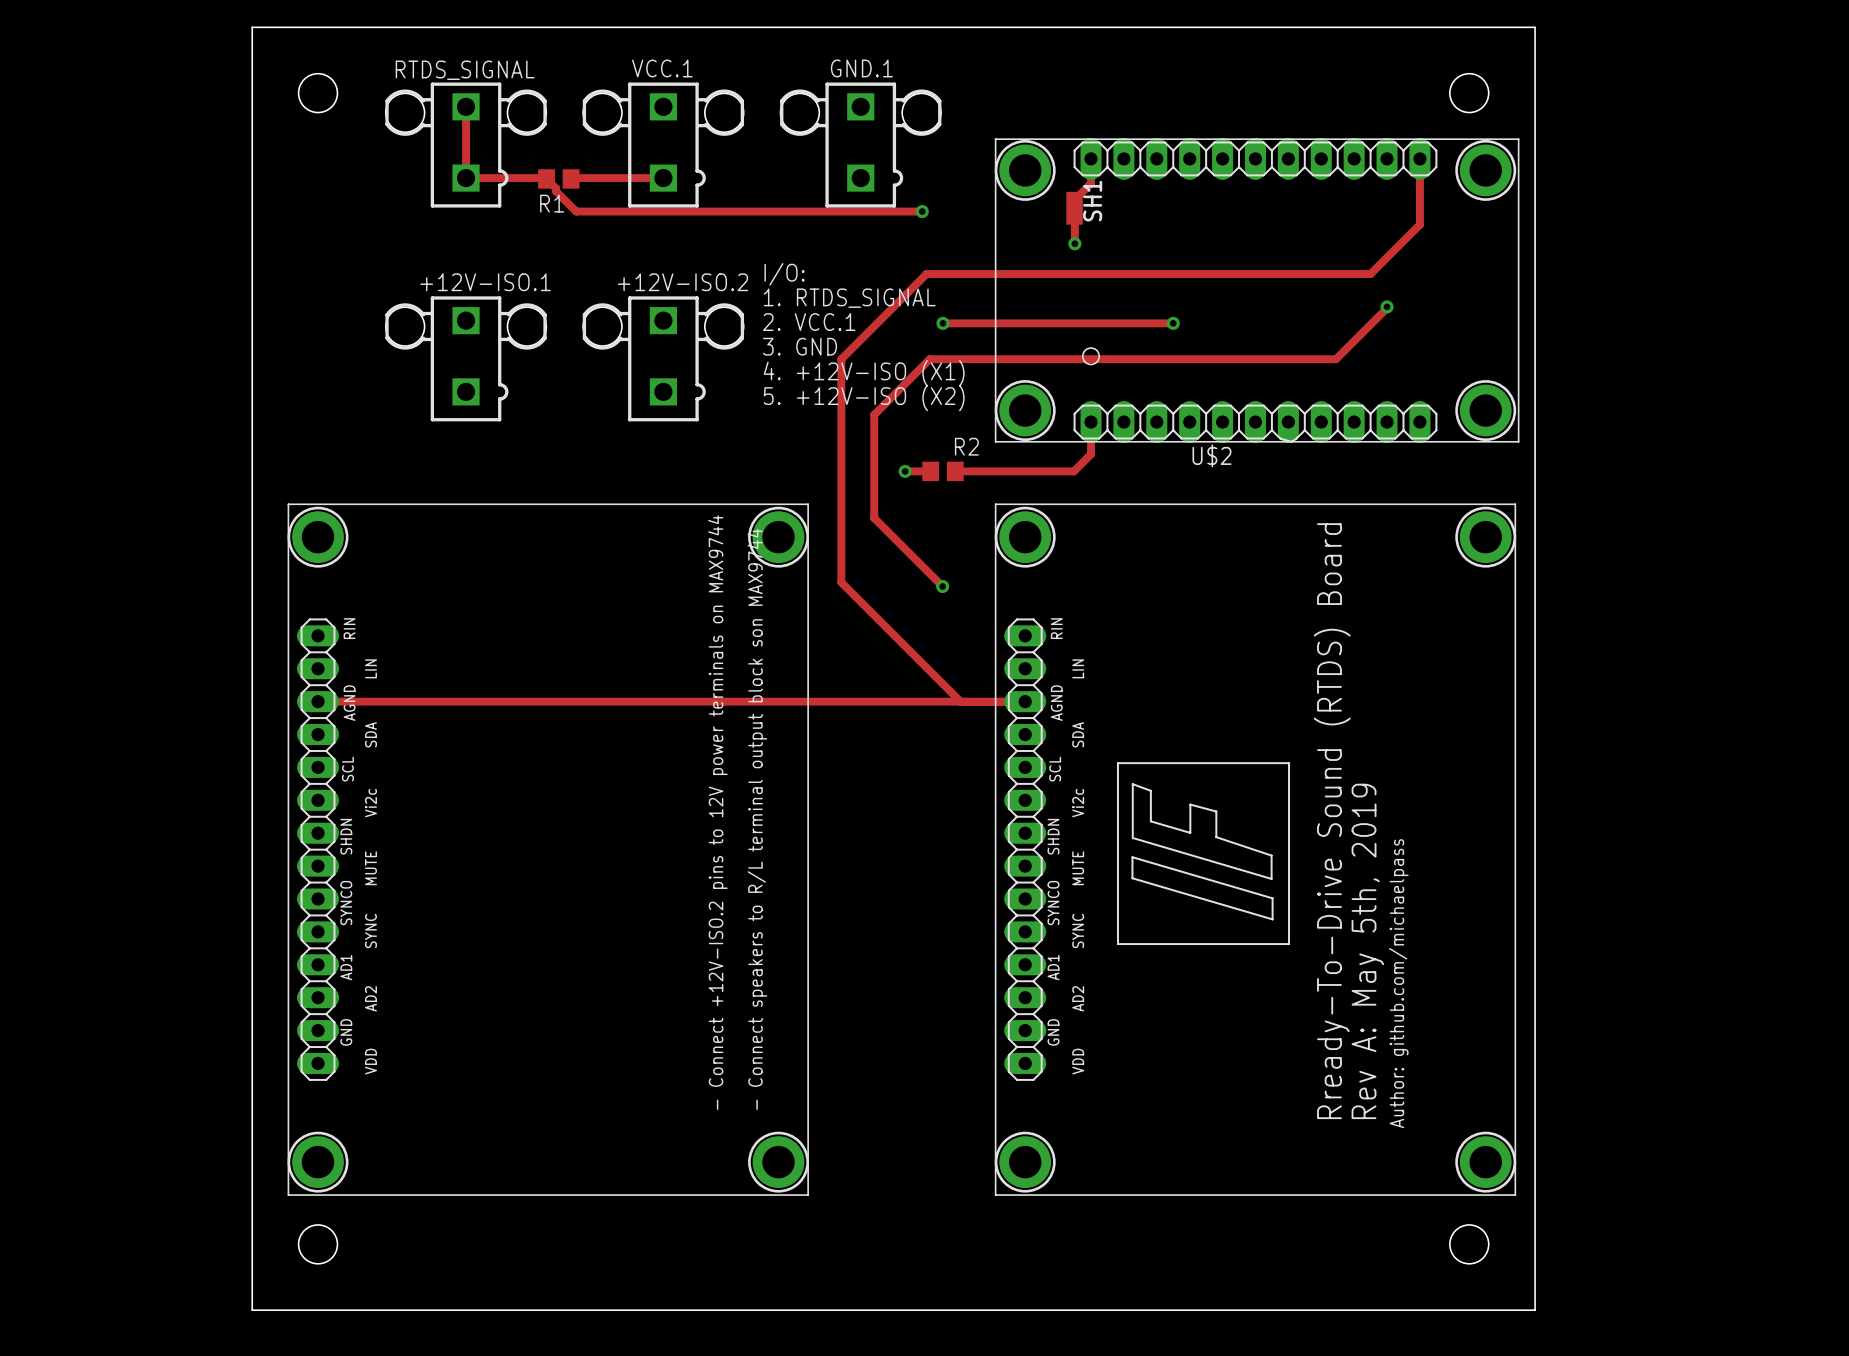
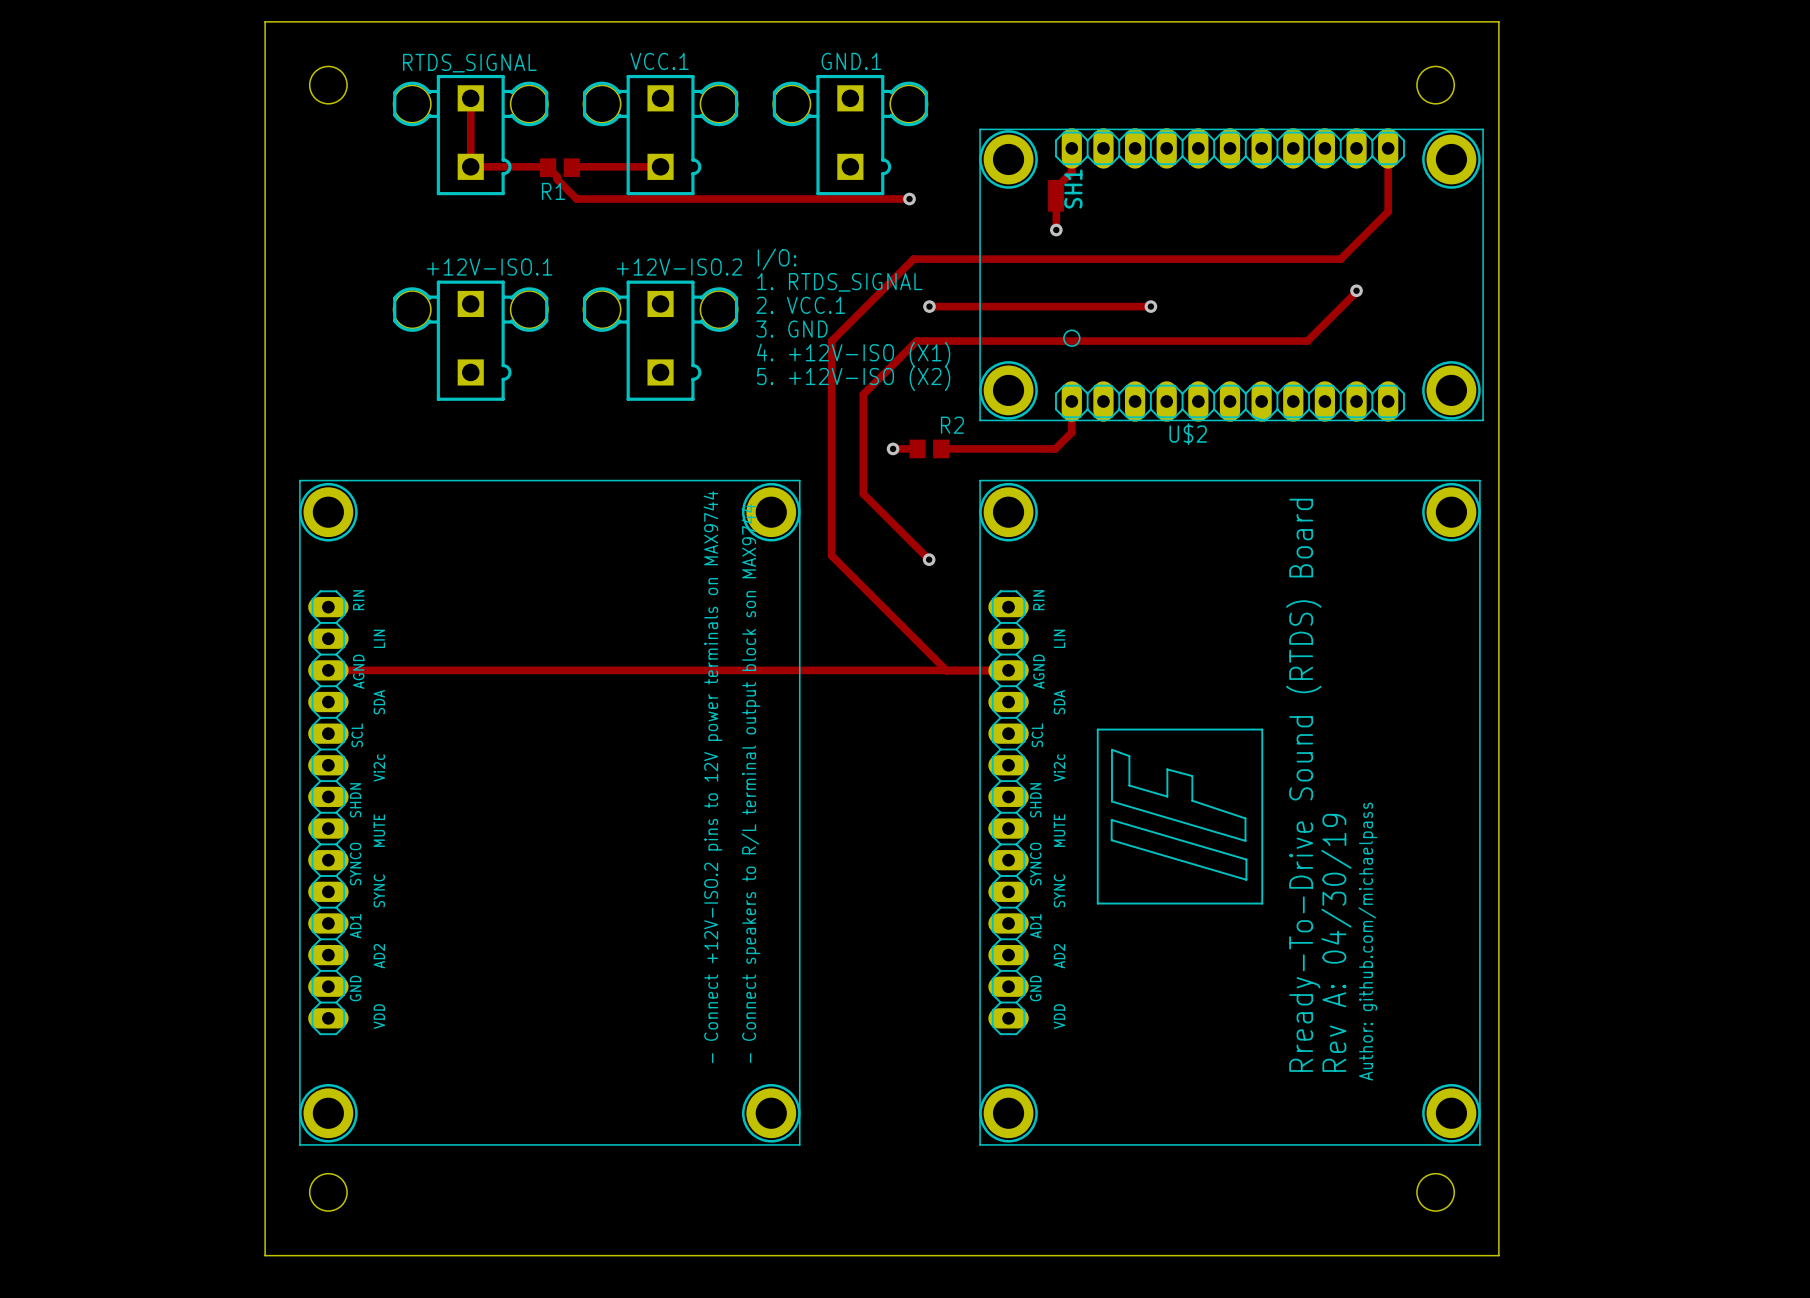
text: Rev A: May 5th, 2019 (1367, 951) -> Rev A: 04/30/19 (1336, 942)

